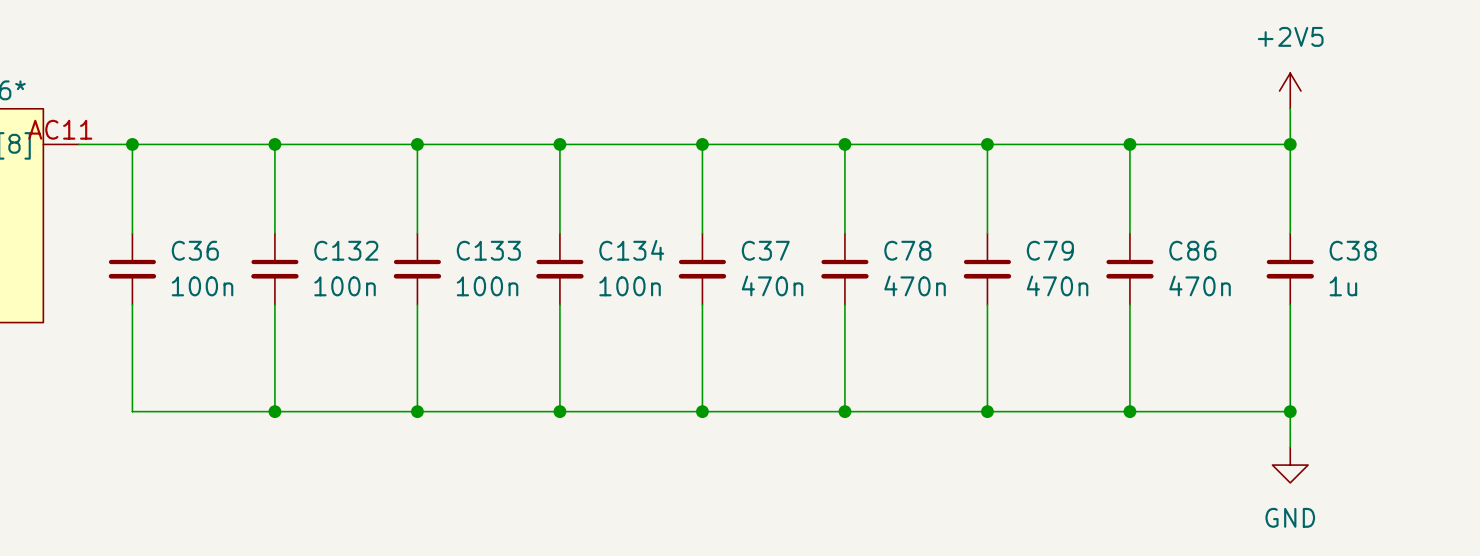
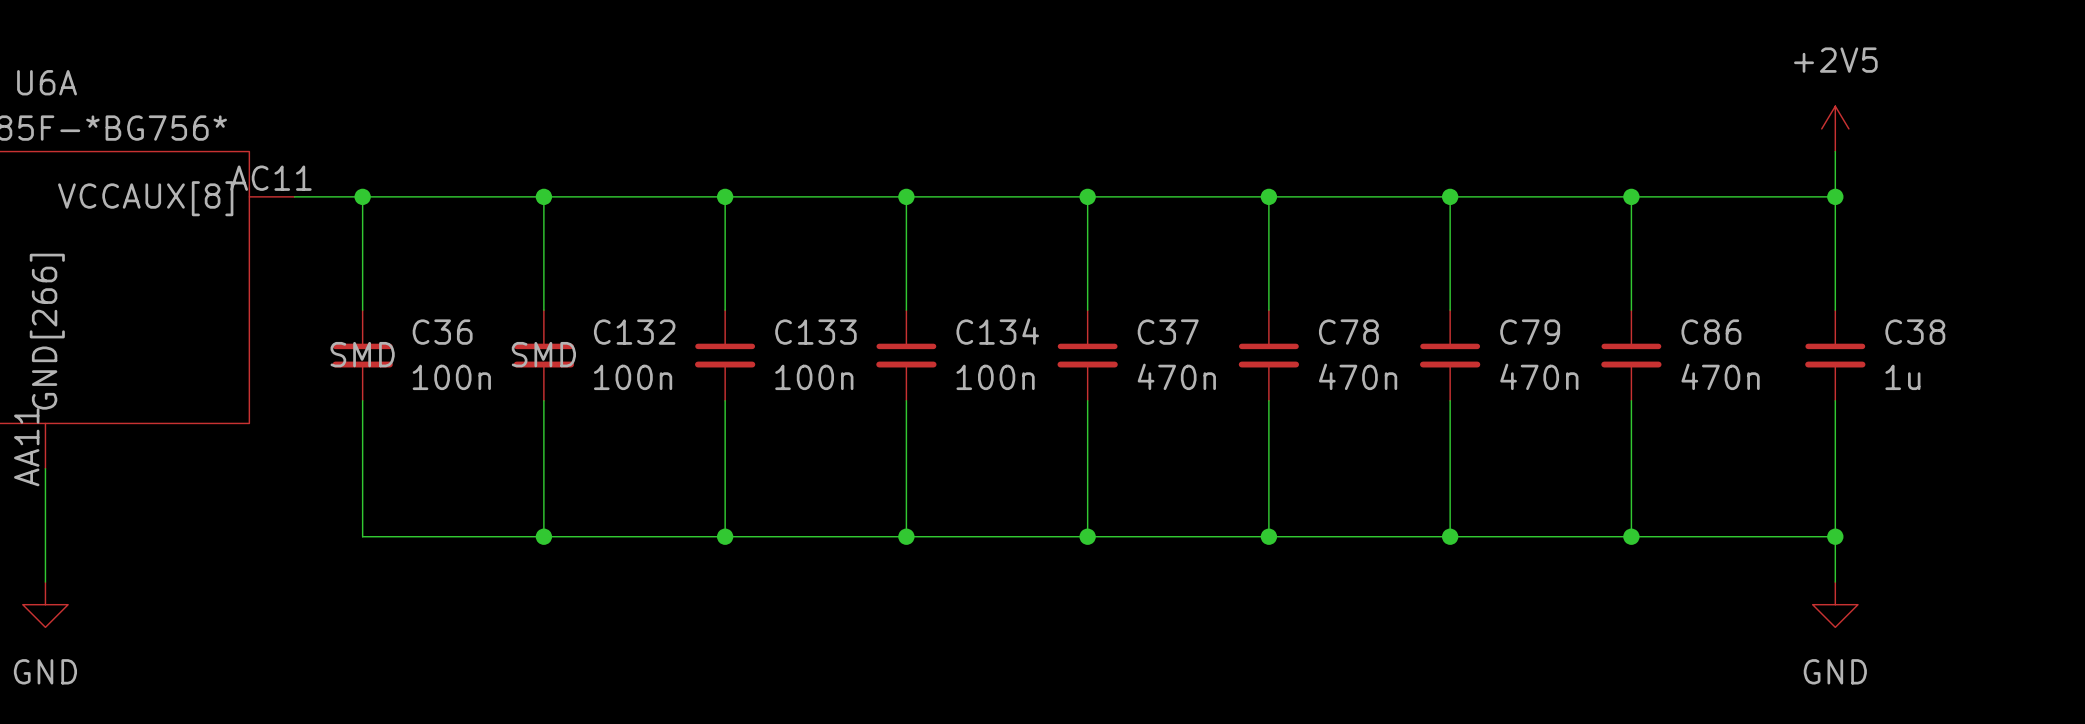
C36 text: none -> SMD (362, 354)
C132 text: none -> SMD (543, 354)

